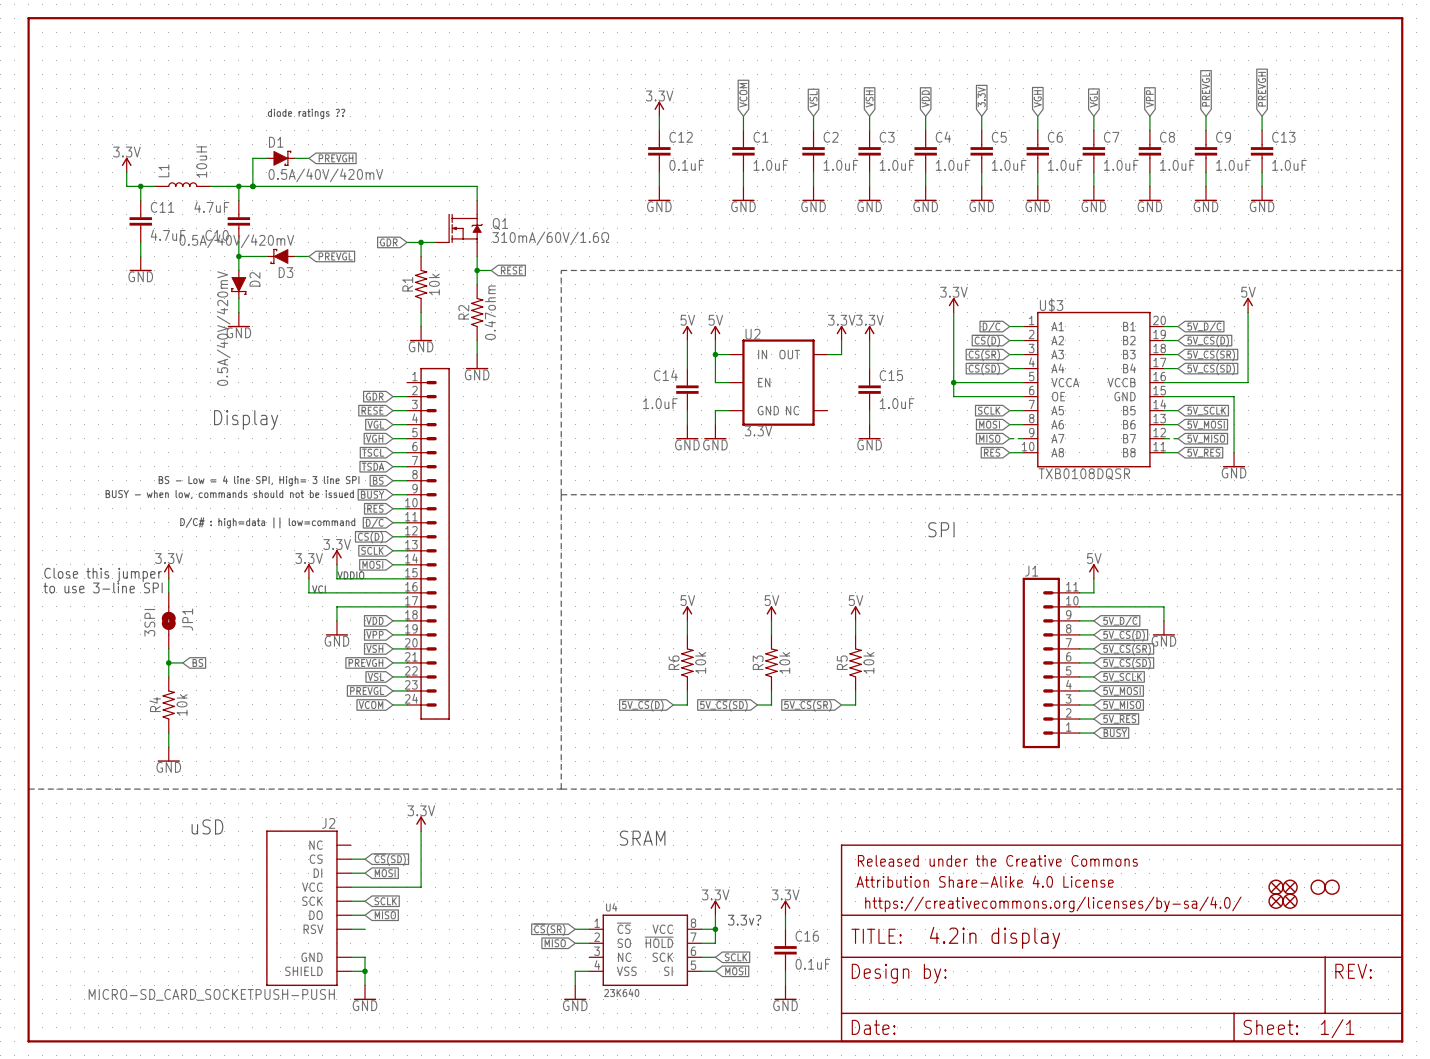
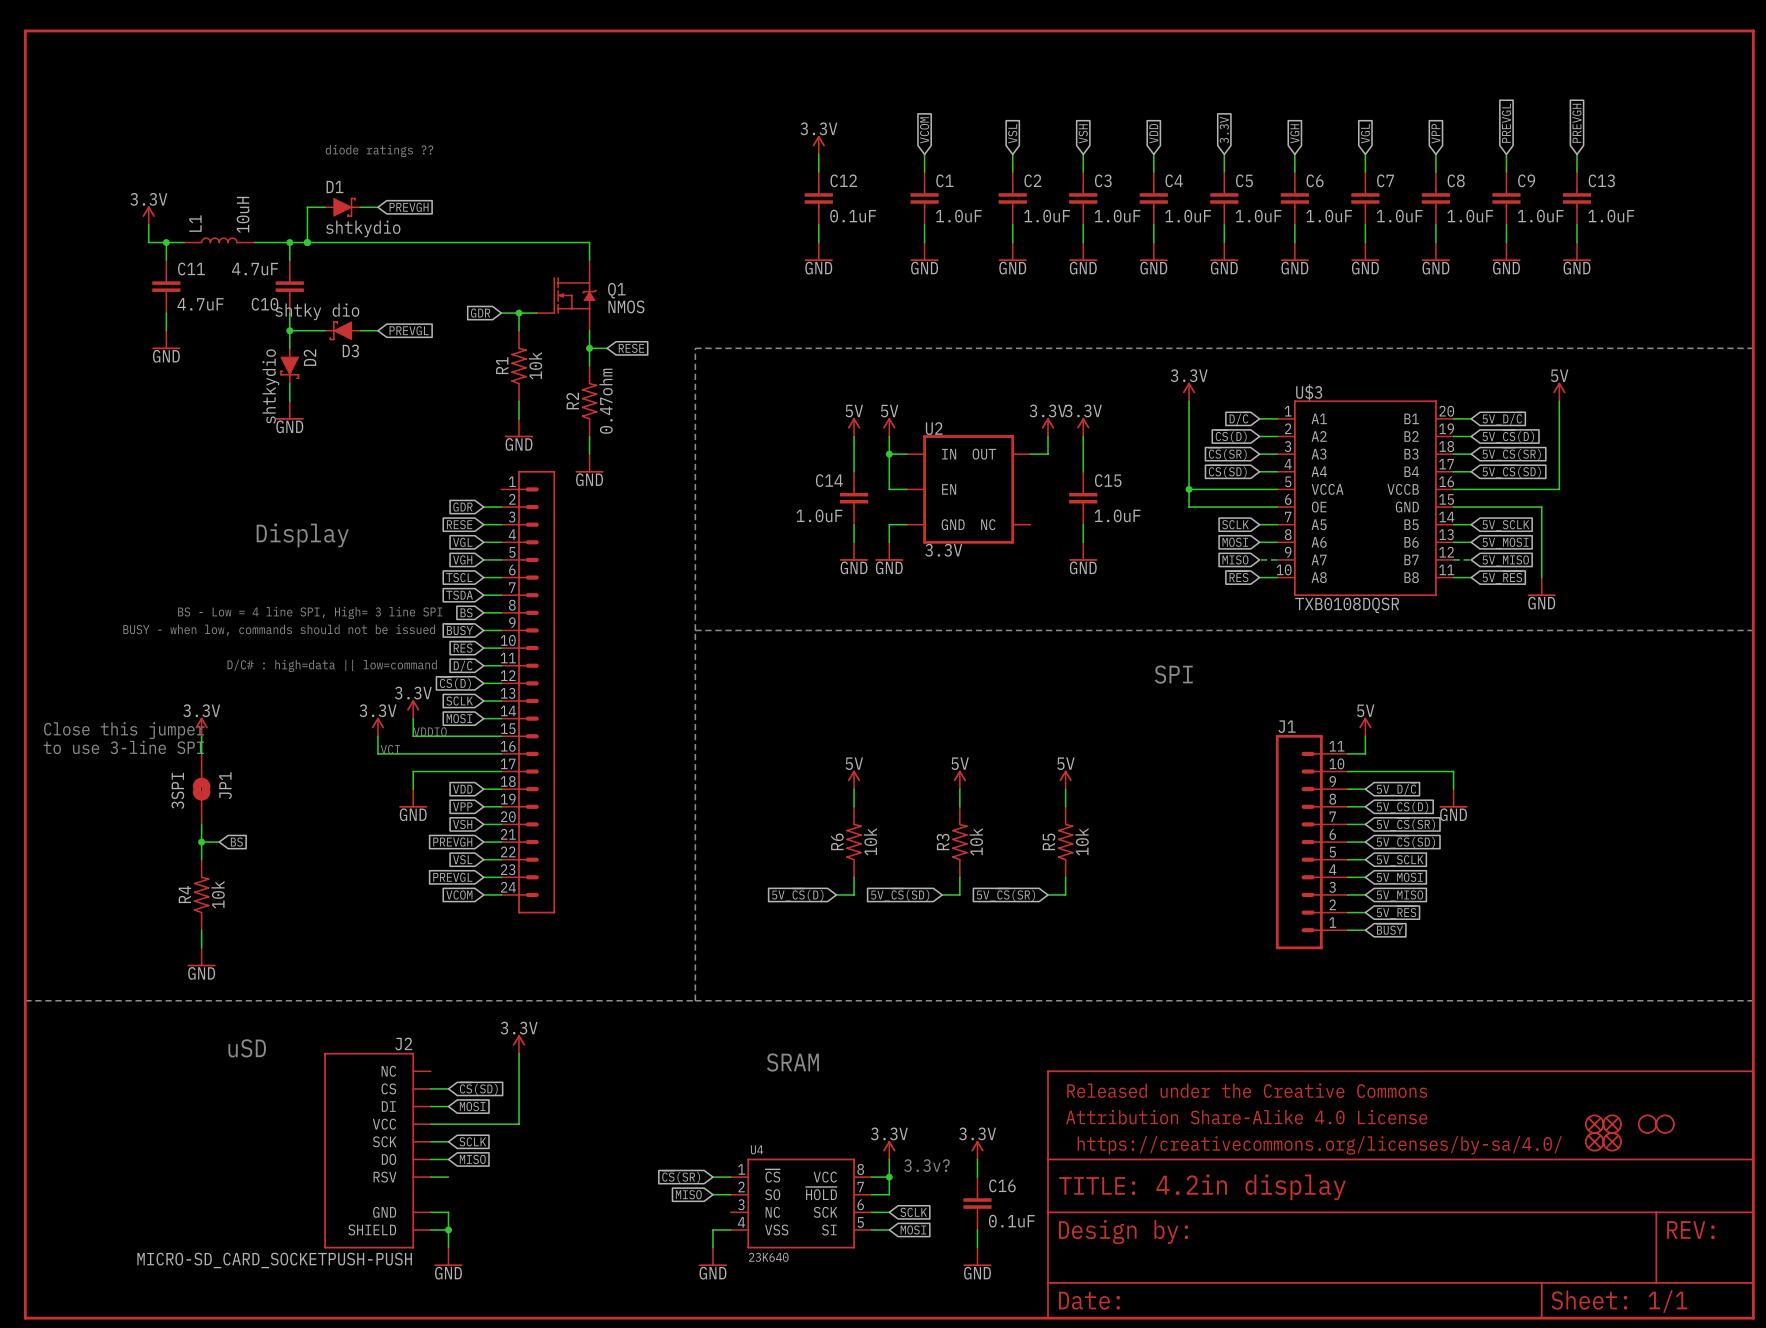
D1 value: 0.5A/40V/420mV (325, 175) -> shtkydio (363, 228)
Q1 value: 310mA/60V/1.6Ω (550, 238) -> NMOS (626, 306)
D3 value: 0.5A/40V/420mV (236, 241) -> shtky dio (317, 311)
D2 value: 0.5A/40V/420mV (223, 328) -> shtkydio (270, 386)

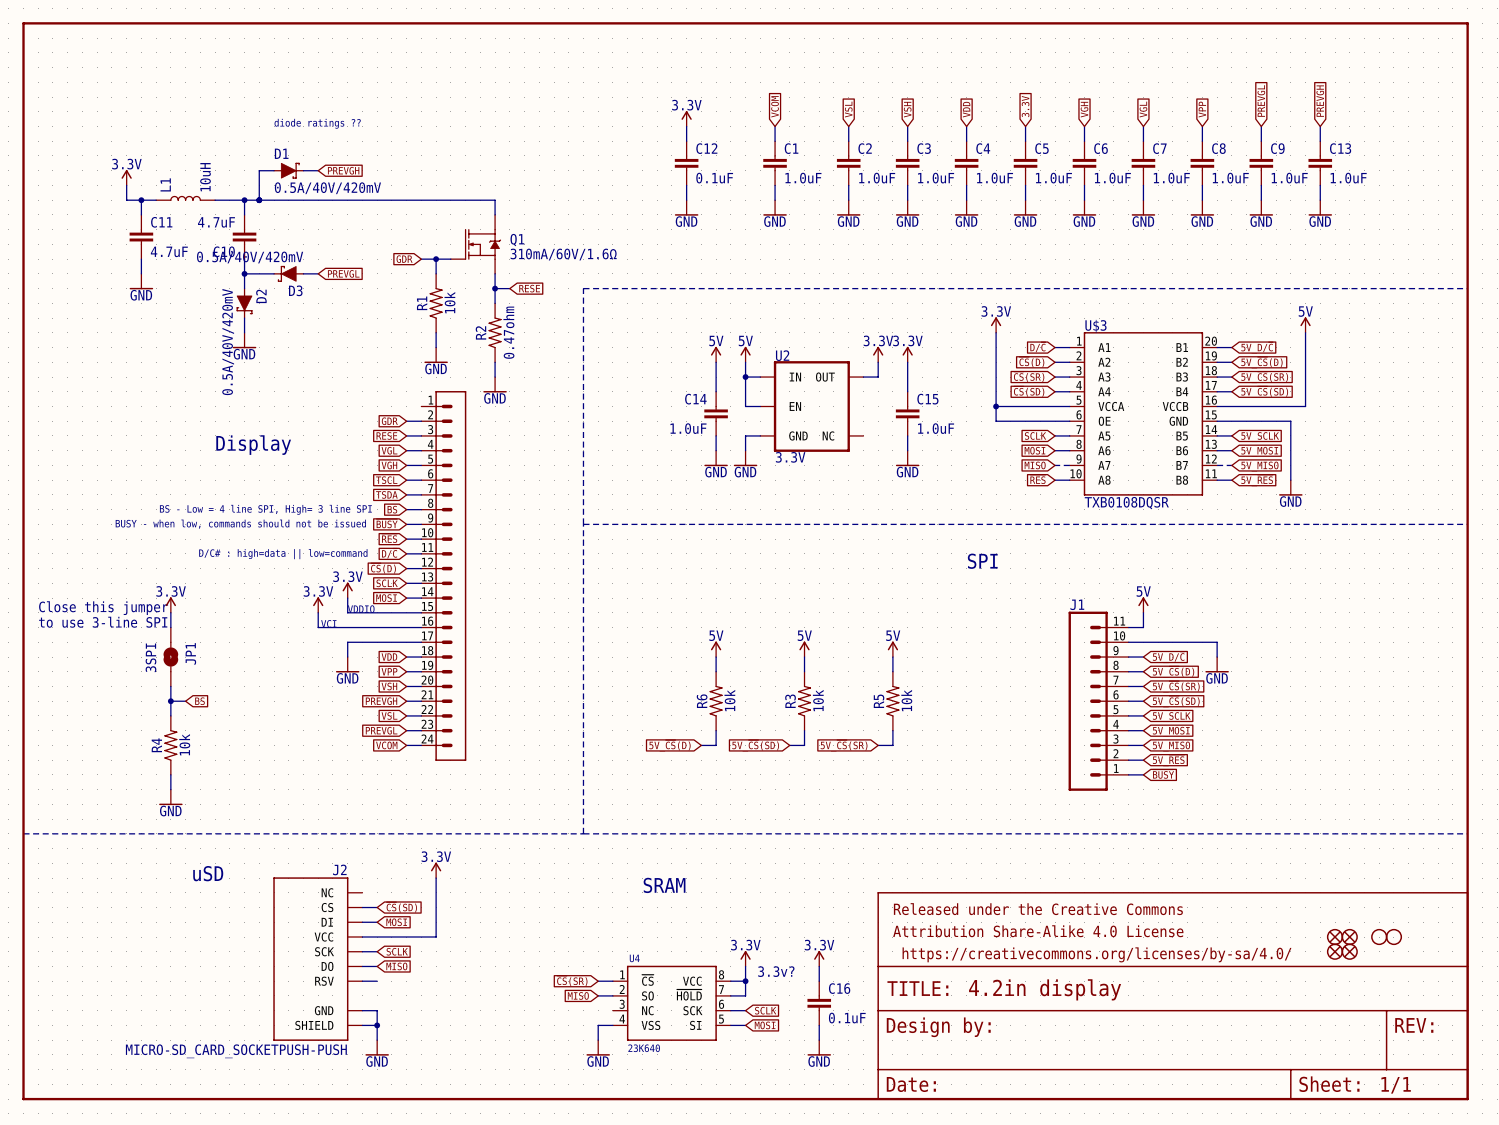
D1 value: shtkydio (363, 228) -> 0.5A/40V/420mV (327, 188)
Q1 value: NMOS (626, 306) -> 310mA/60V/1.6Ω (563, 254)
D3 value: shtky dio (317, 311) -> 0.5A/40V/420mV (250, 257)
D2 value: shtkydio (270, 386) -> 0.5A/40V/420mV (228, 342)

